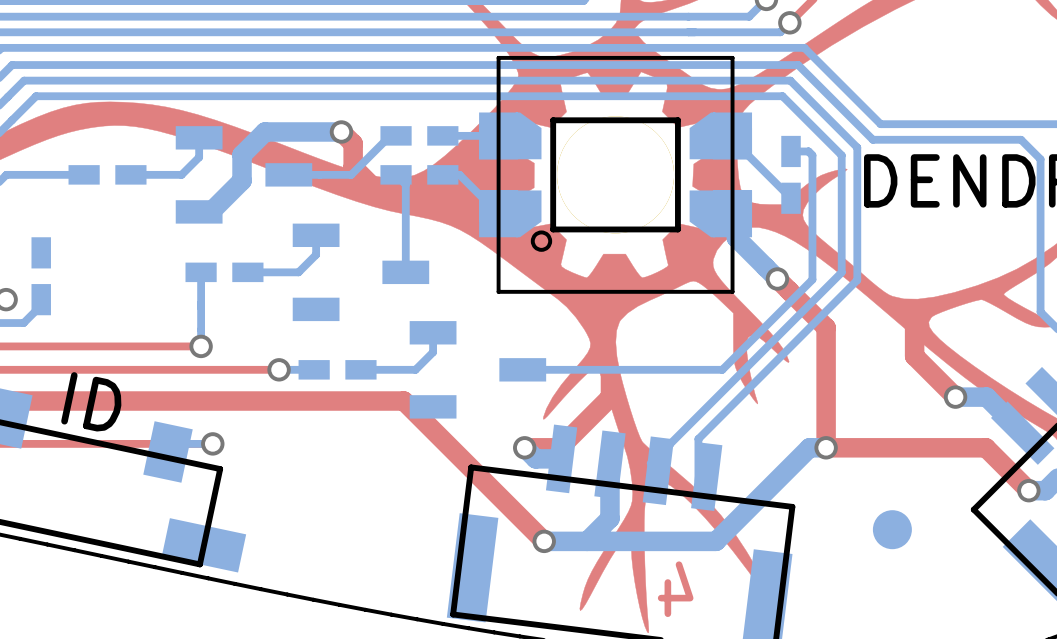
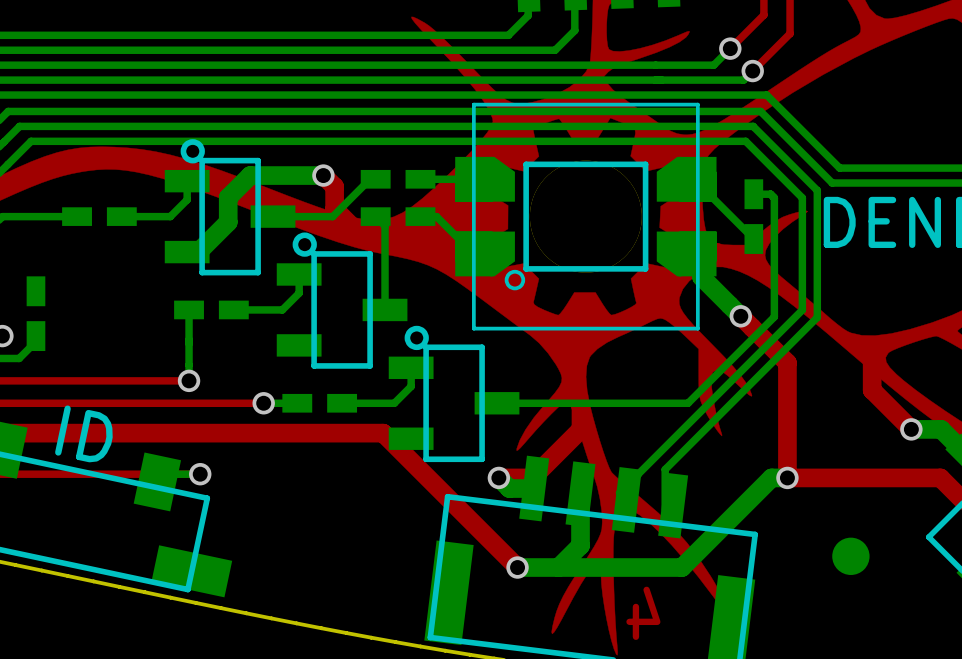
part footprint: [175, 126, 313, 224] -> [164, 139, 296, 276]
part footprint: [292, 223, 430, 322] -> [276, 232, 408, 369]
part footprint: [409, 321, 547, 419] -> [388, 325, 520, 463]

